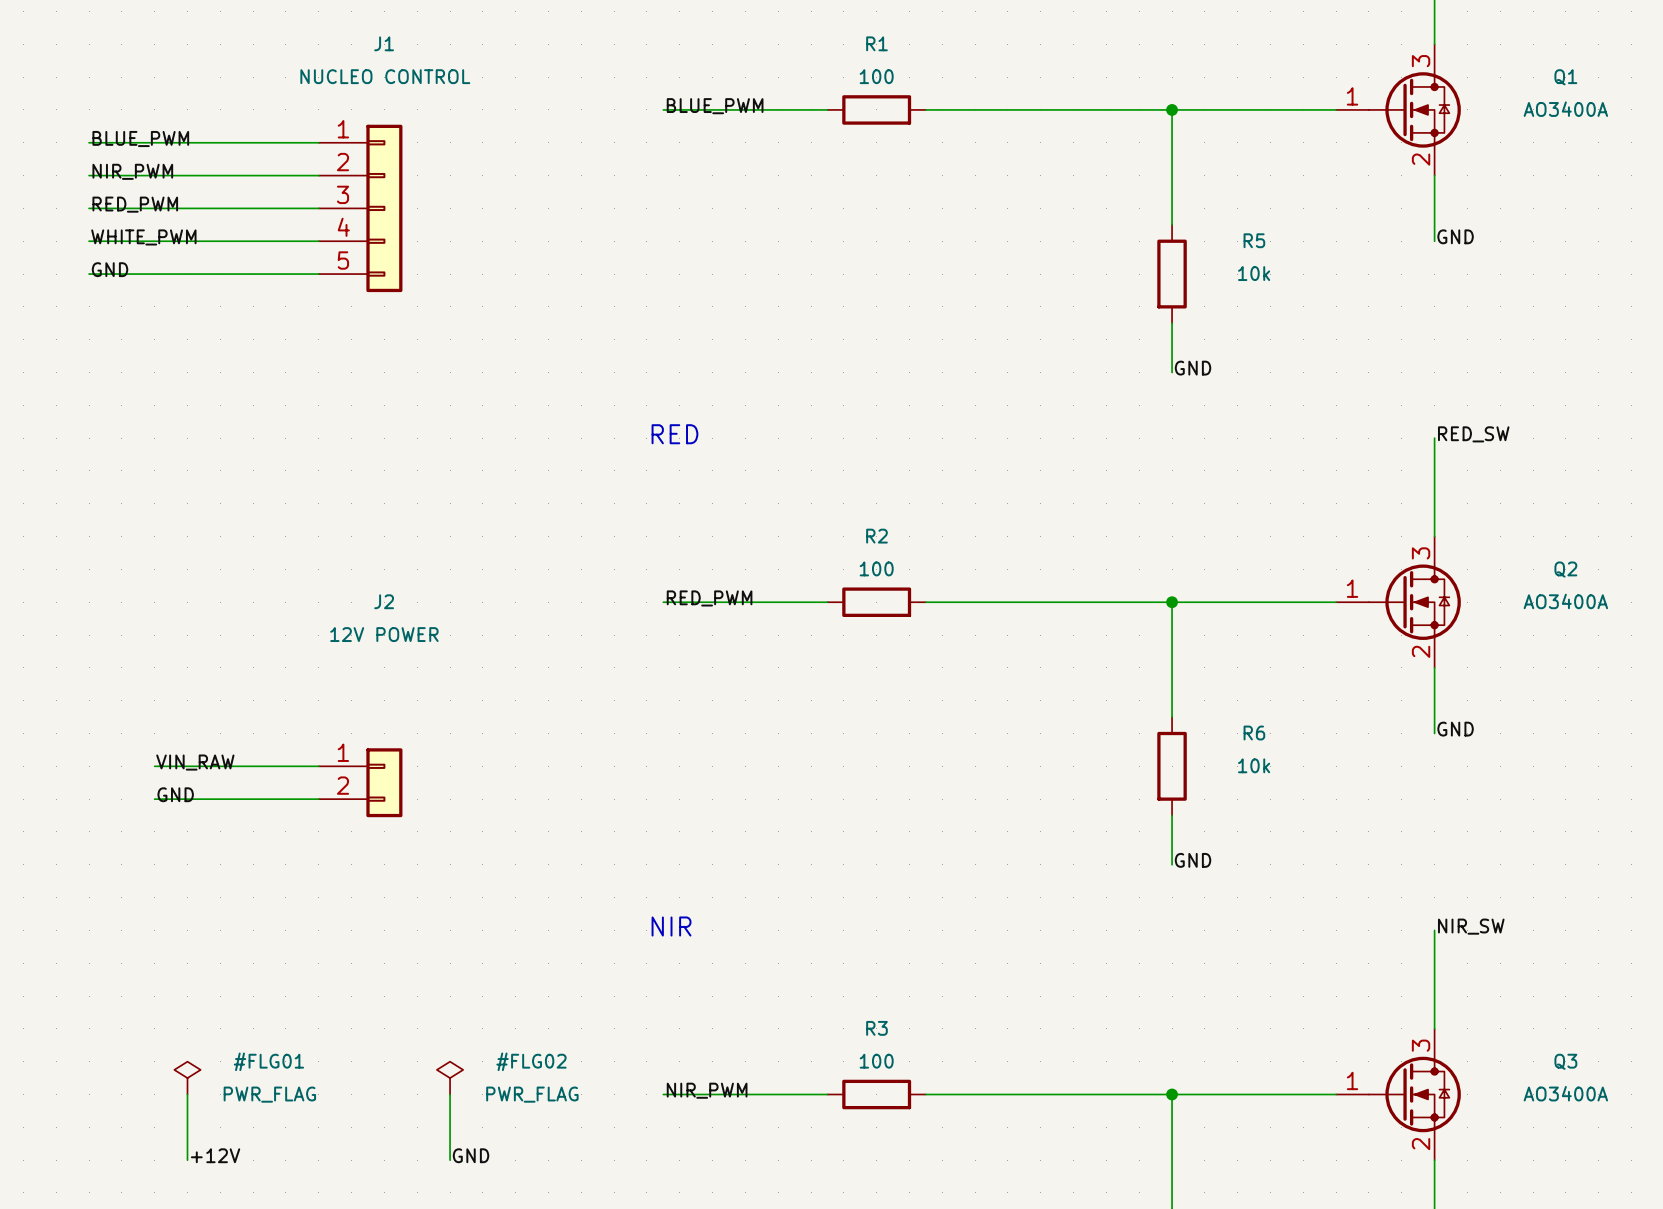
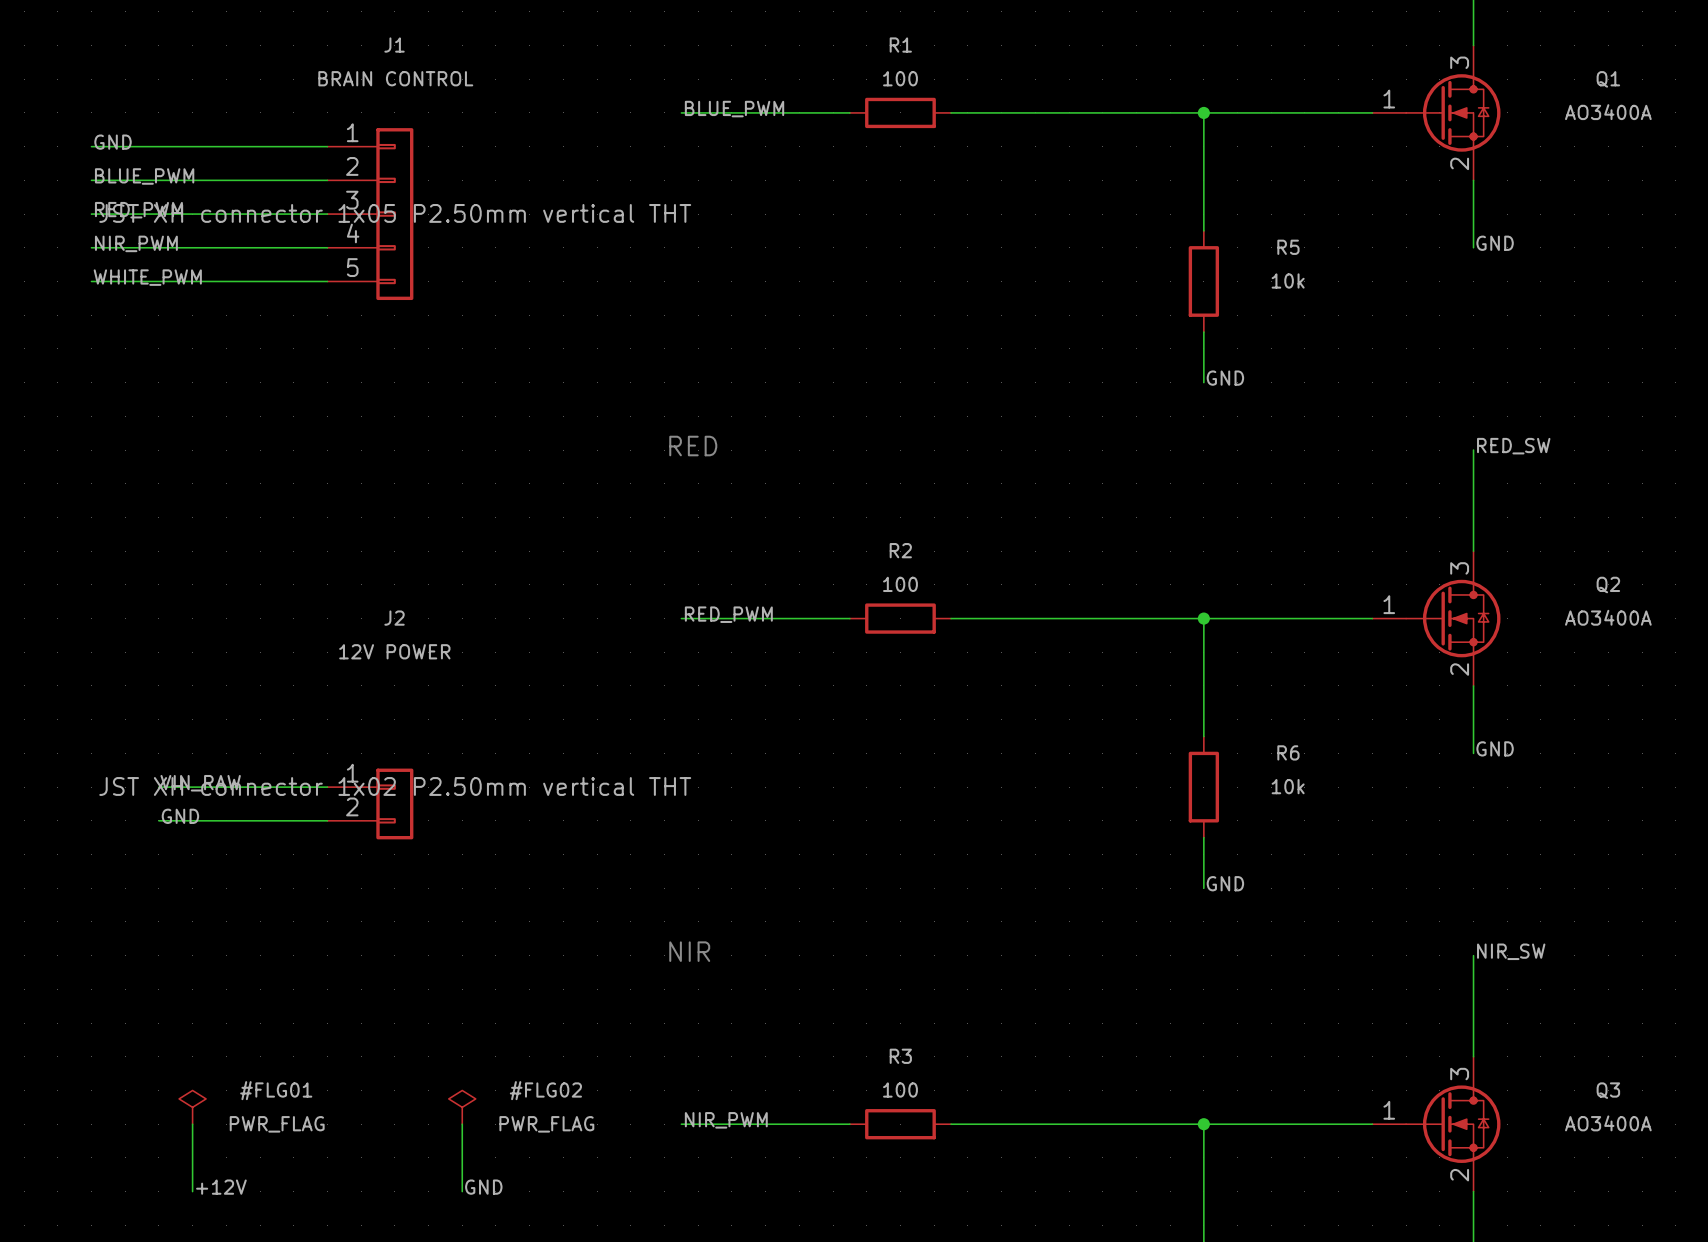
J1 value: NUCLEO CONTROL (385, 76) -> BRAIN CONTROL (395, 78)
label: BLUE_PWM (140, 139) -> GND (113, 142)
label: NIR_PWM (132, 171) -> BLUE_PWM (144, 176)
J1 text: none -> JST XH connector 1x05 P2.50mm vertical THT (395, 213)
label: WHITE_PWM (143, 237) -> NIR_PWM (136, 243)
label: GND (110, 269) -> WHITE_PWM (147, 277)
J2 text: none -> JST XH connector 1x02 P2.50mm vertical THT (395, 786)

